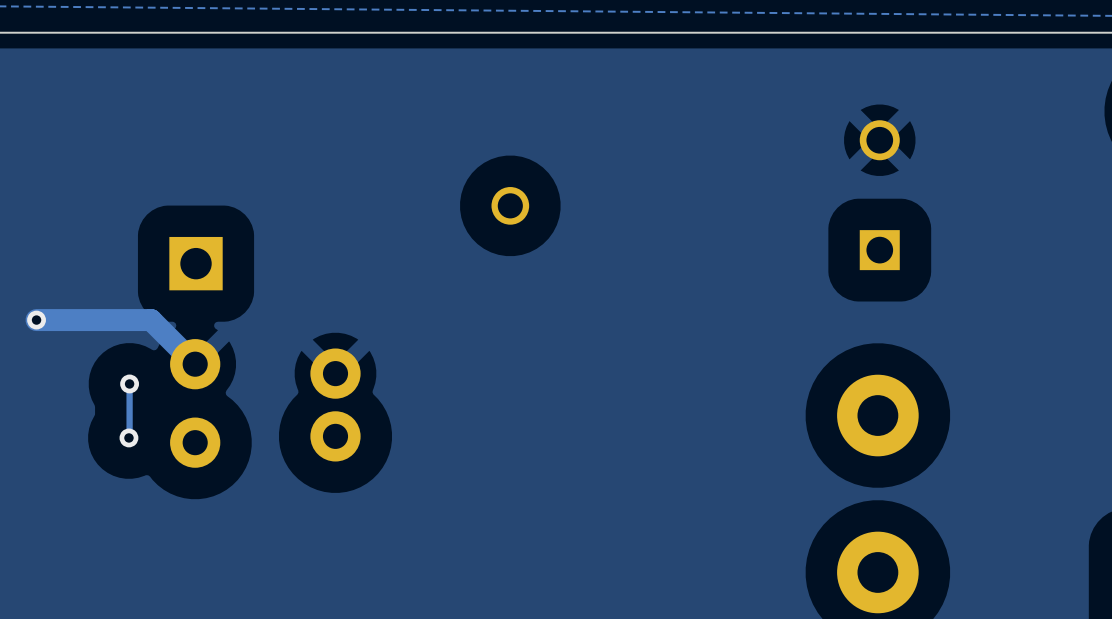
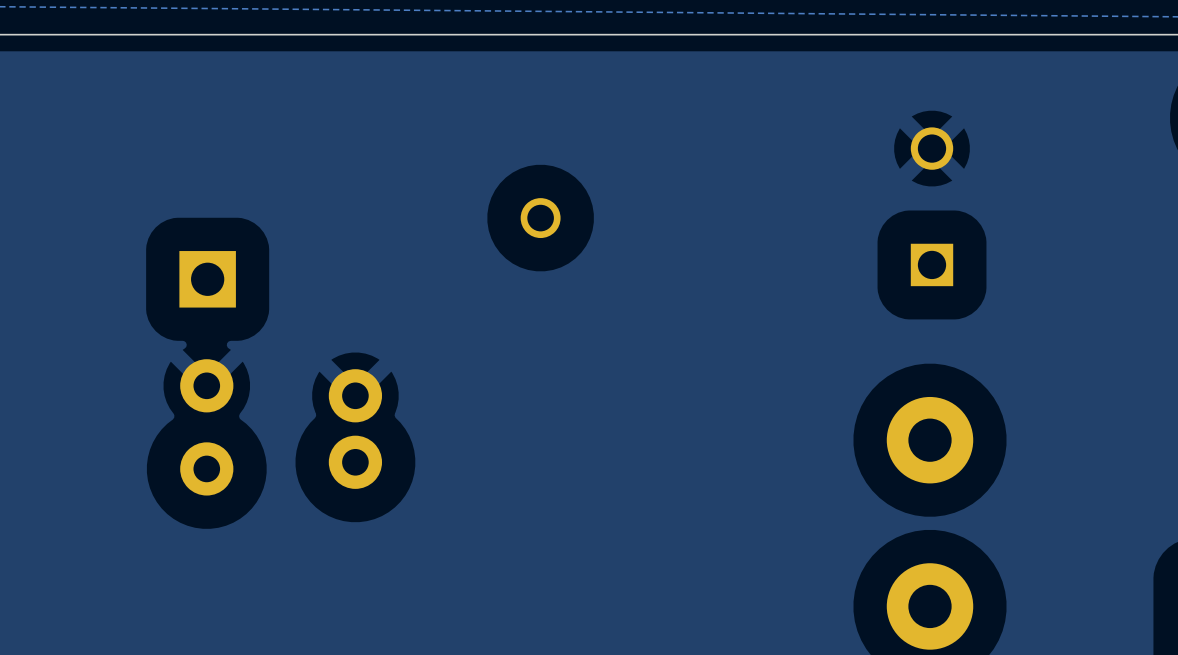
track: (36, 320) (151, 320) (195, 364) -> none
via: (36, 320) -> none
track: (129, 383) (128, 437) -> none
via: (129, 383) -> none
via: (128, 437) -> none

